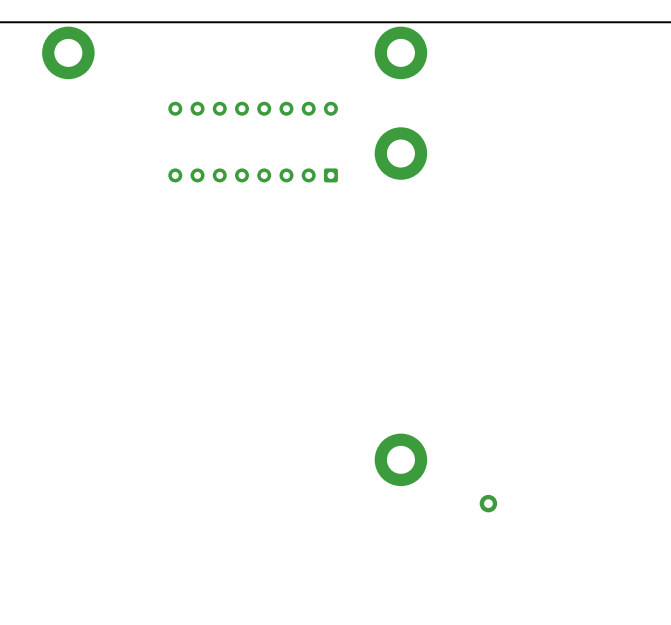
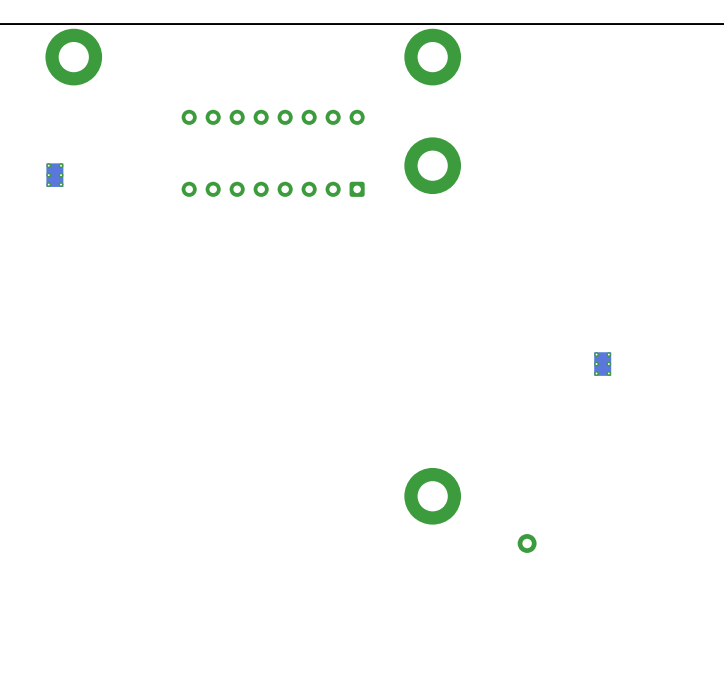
part: none -> (54, 175)
part: none -> (602, 364)

